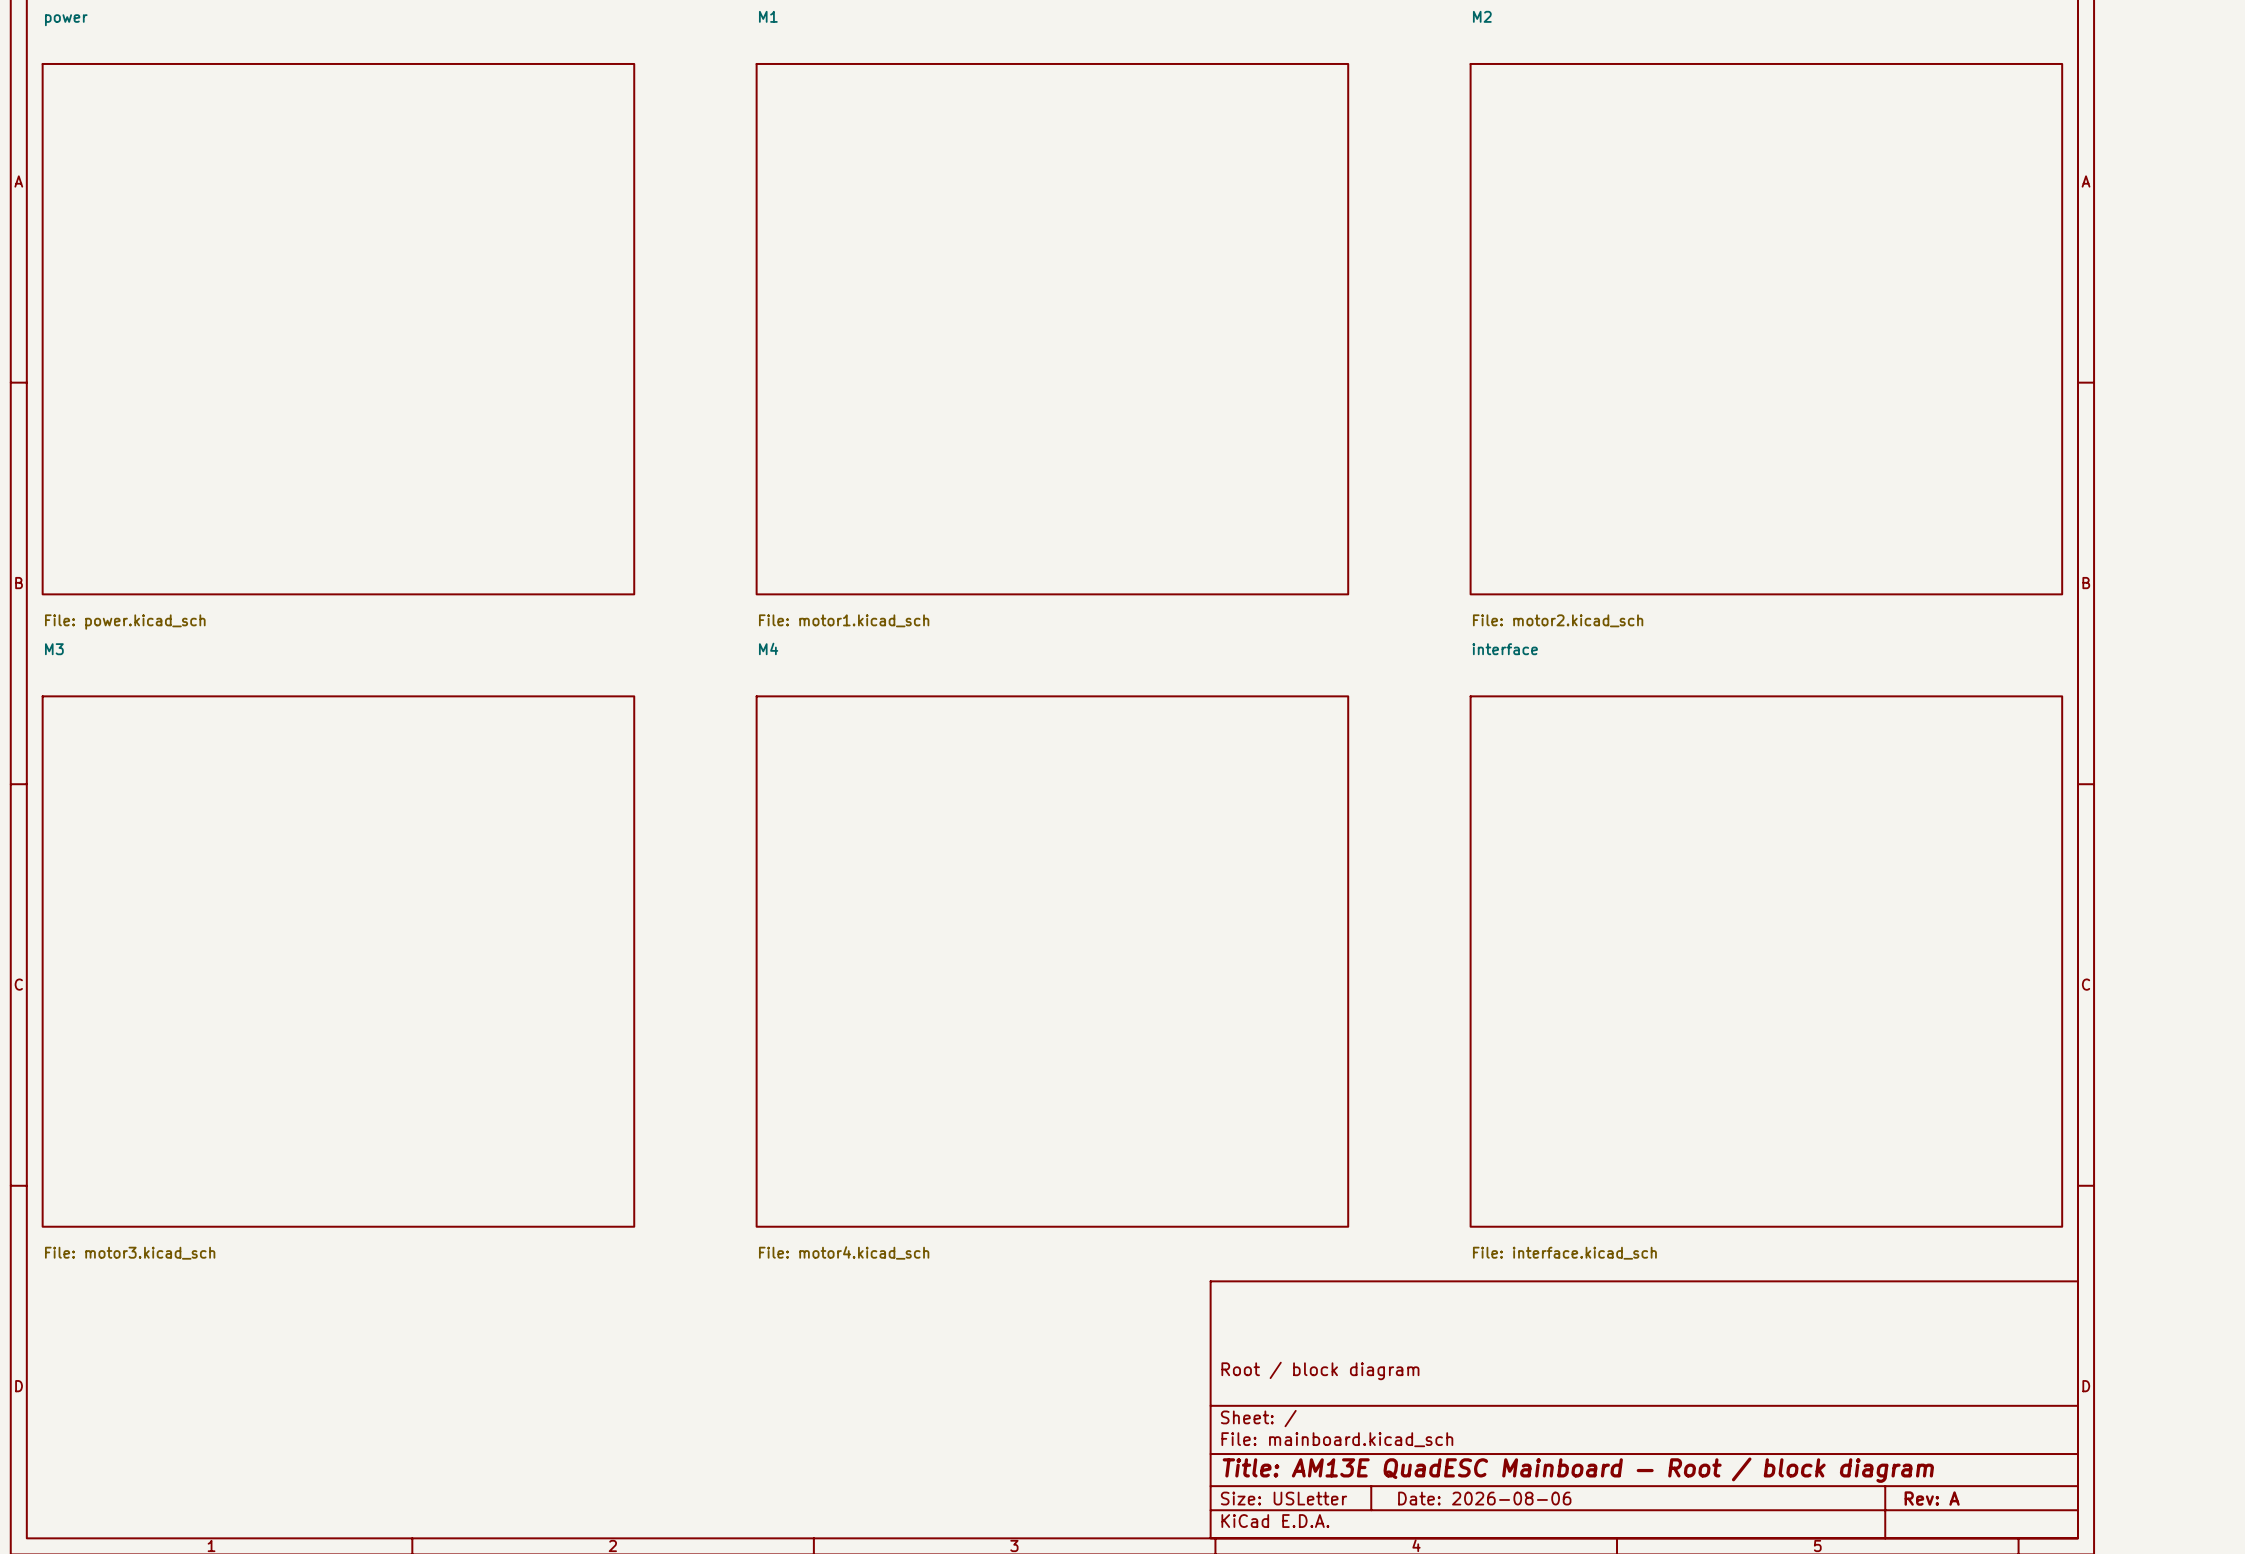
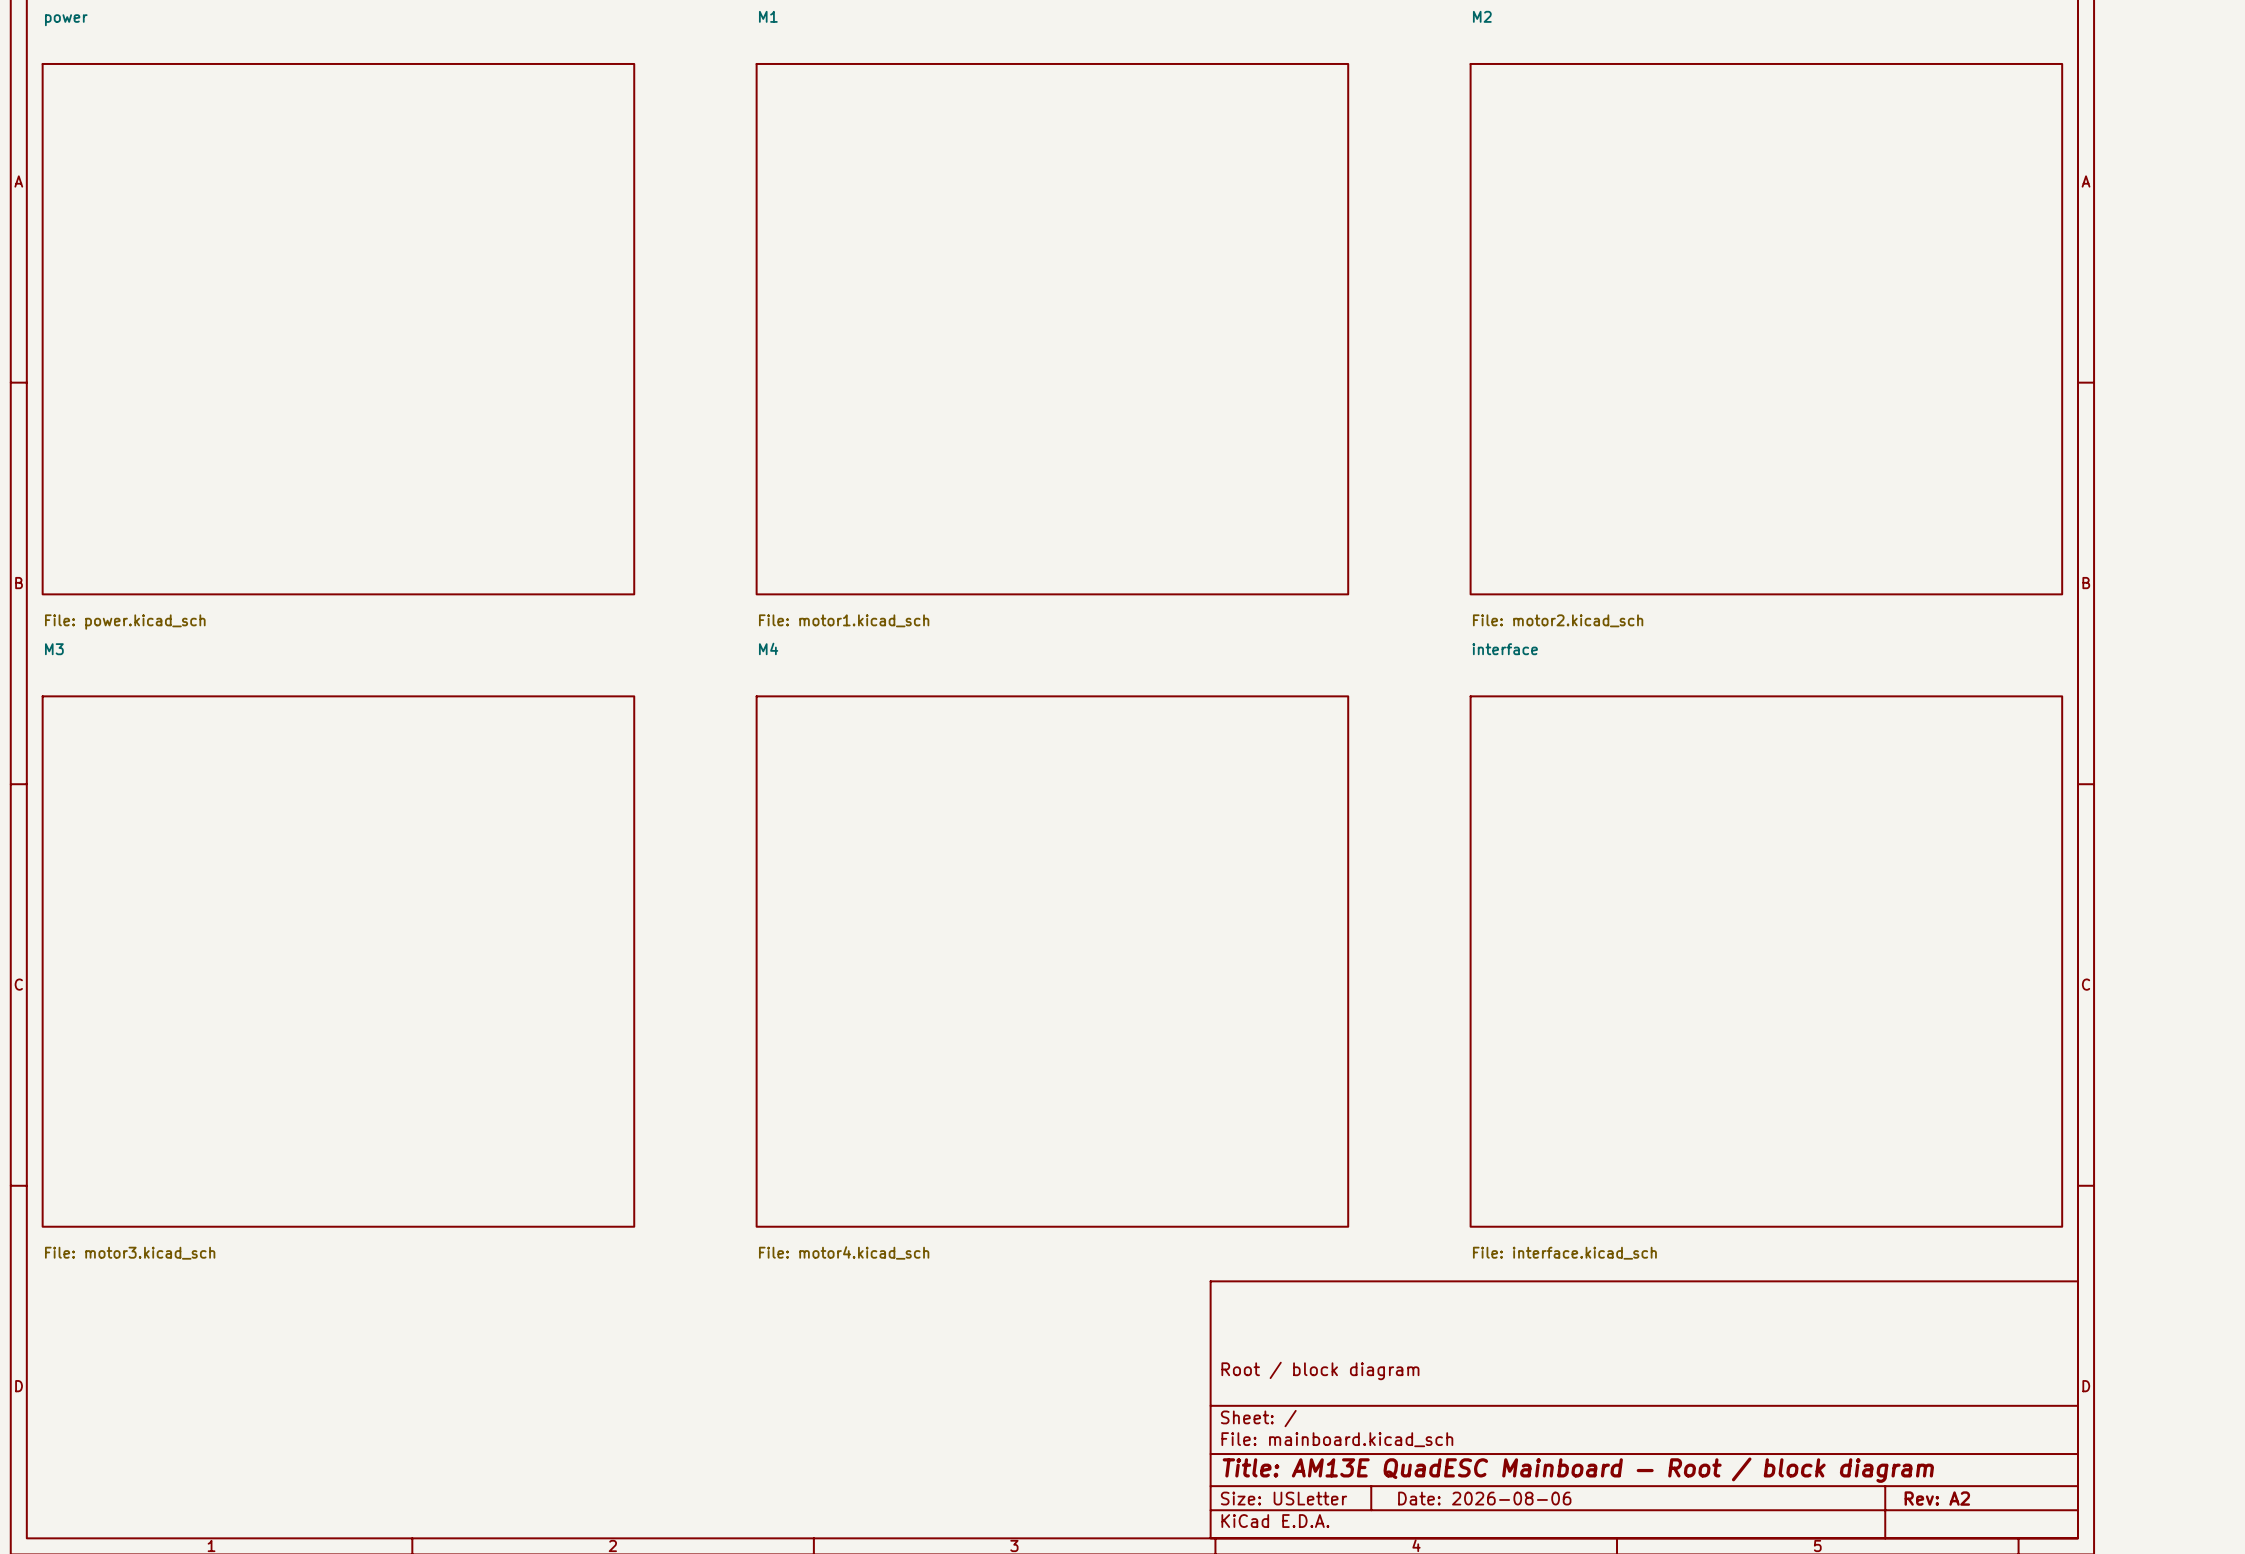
title block: Rev: A (1932, 1498) -> Rev: A2 (1937, 1498)

